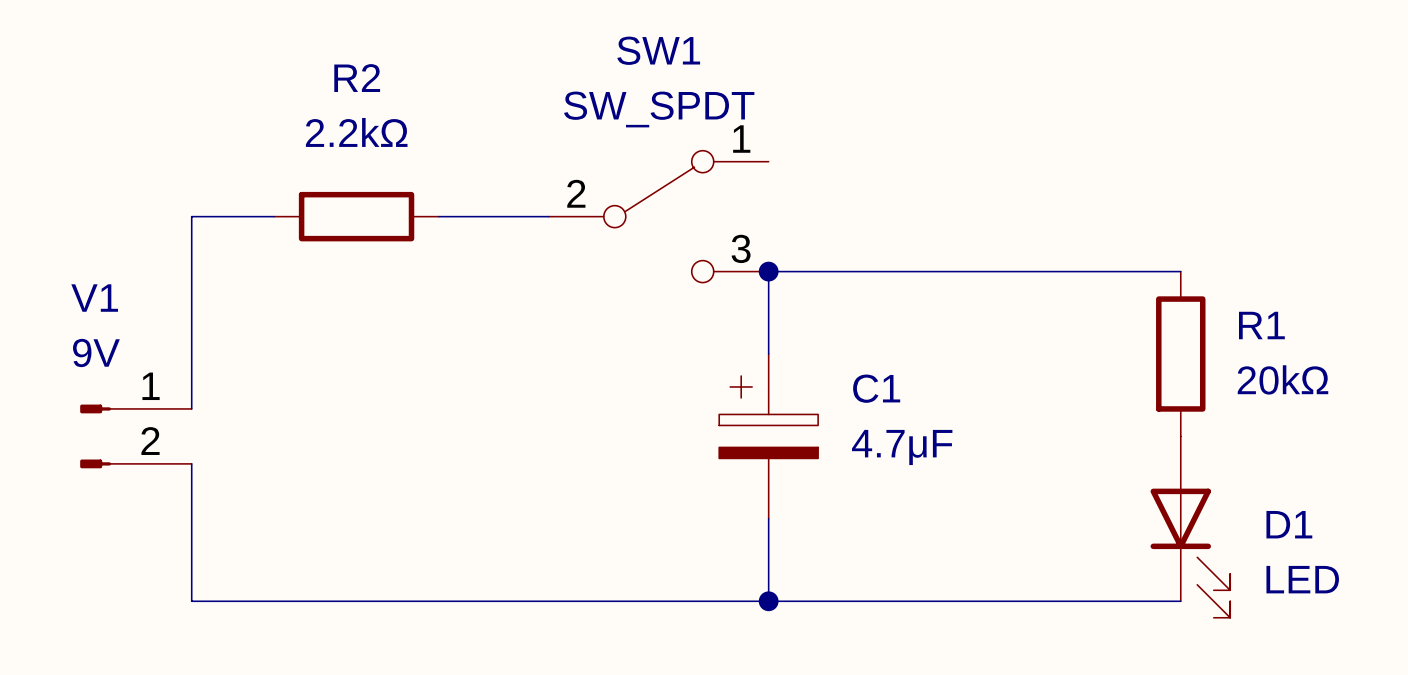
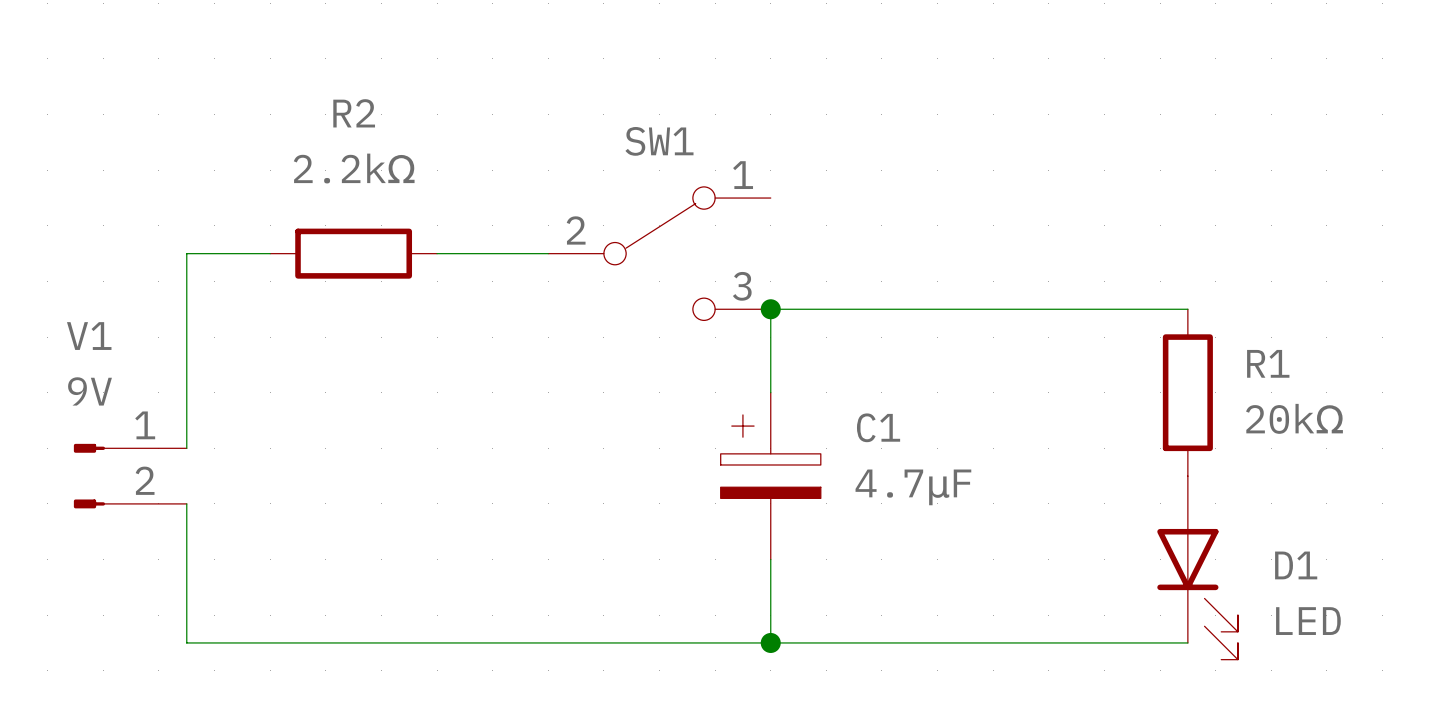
SW1 name position: SW1 (658, 50) -> SW1 (659, 141)
SW1 value: SW_SPDT (659, 109) -> none

